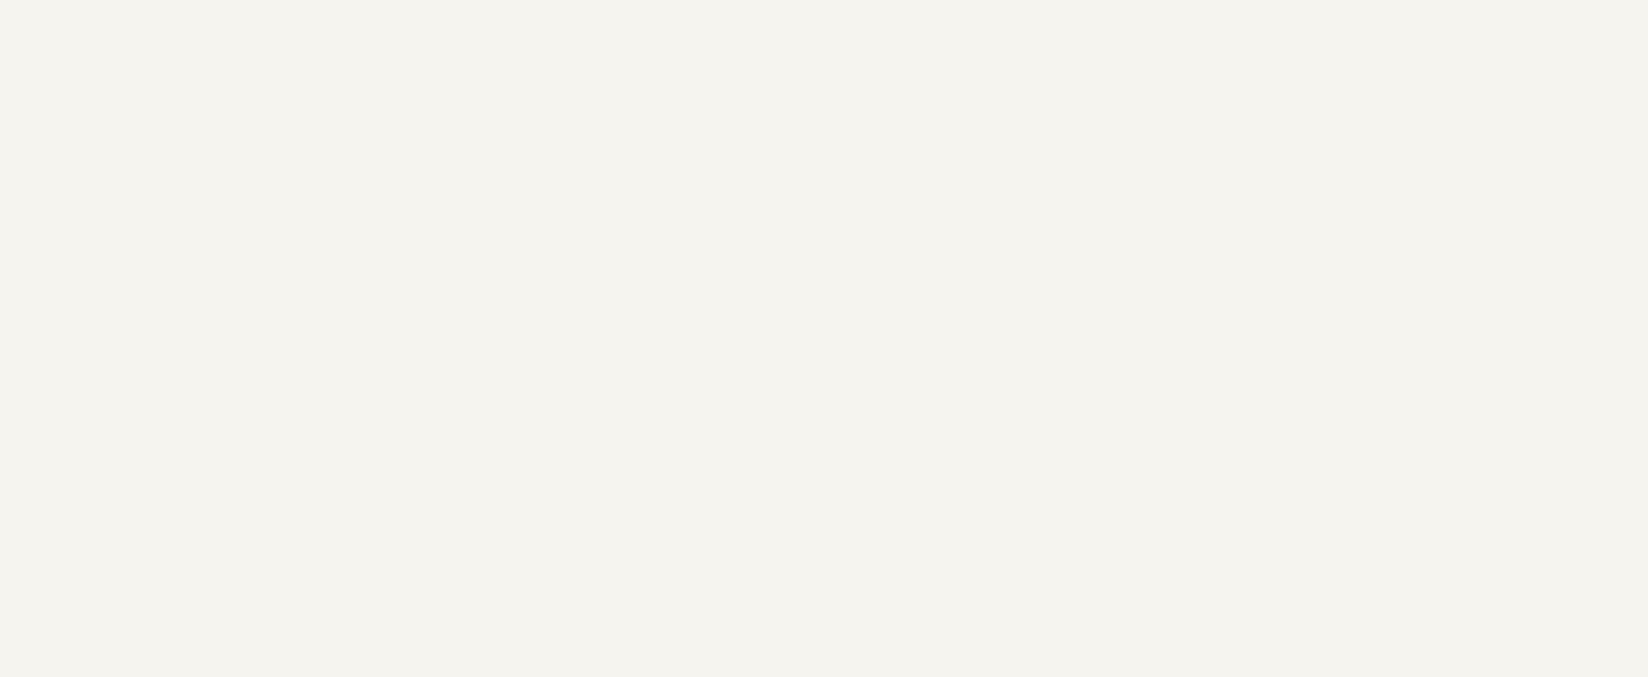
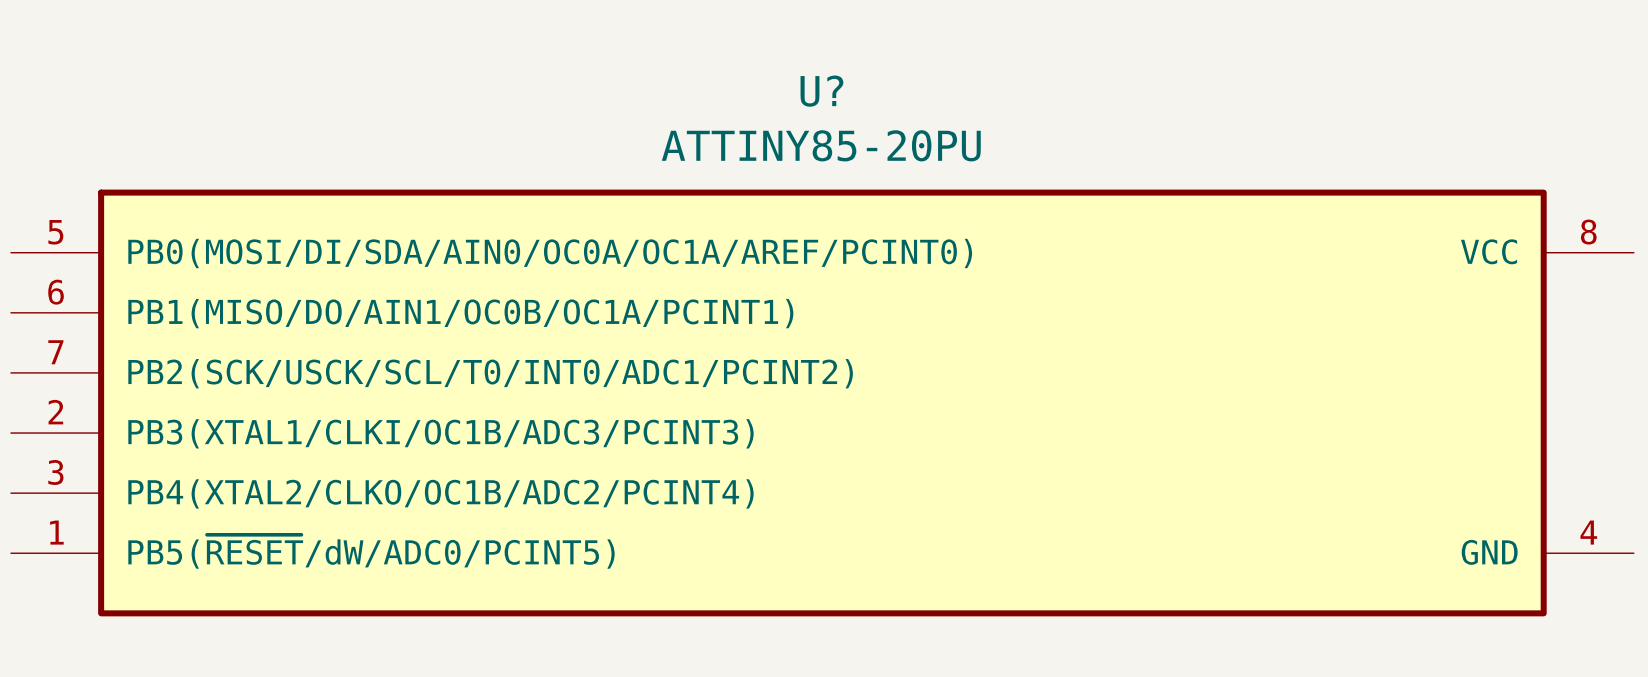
U?: none -> ATTINY85-20PU (822, 402)

